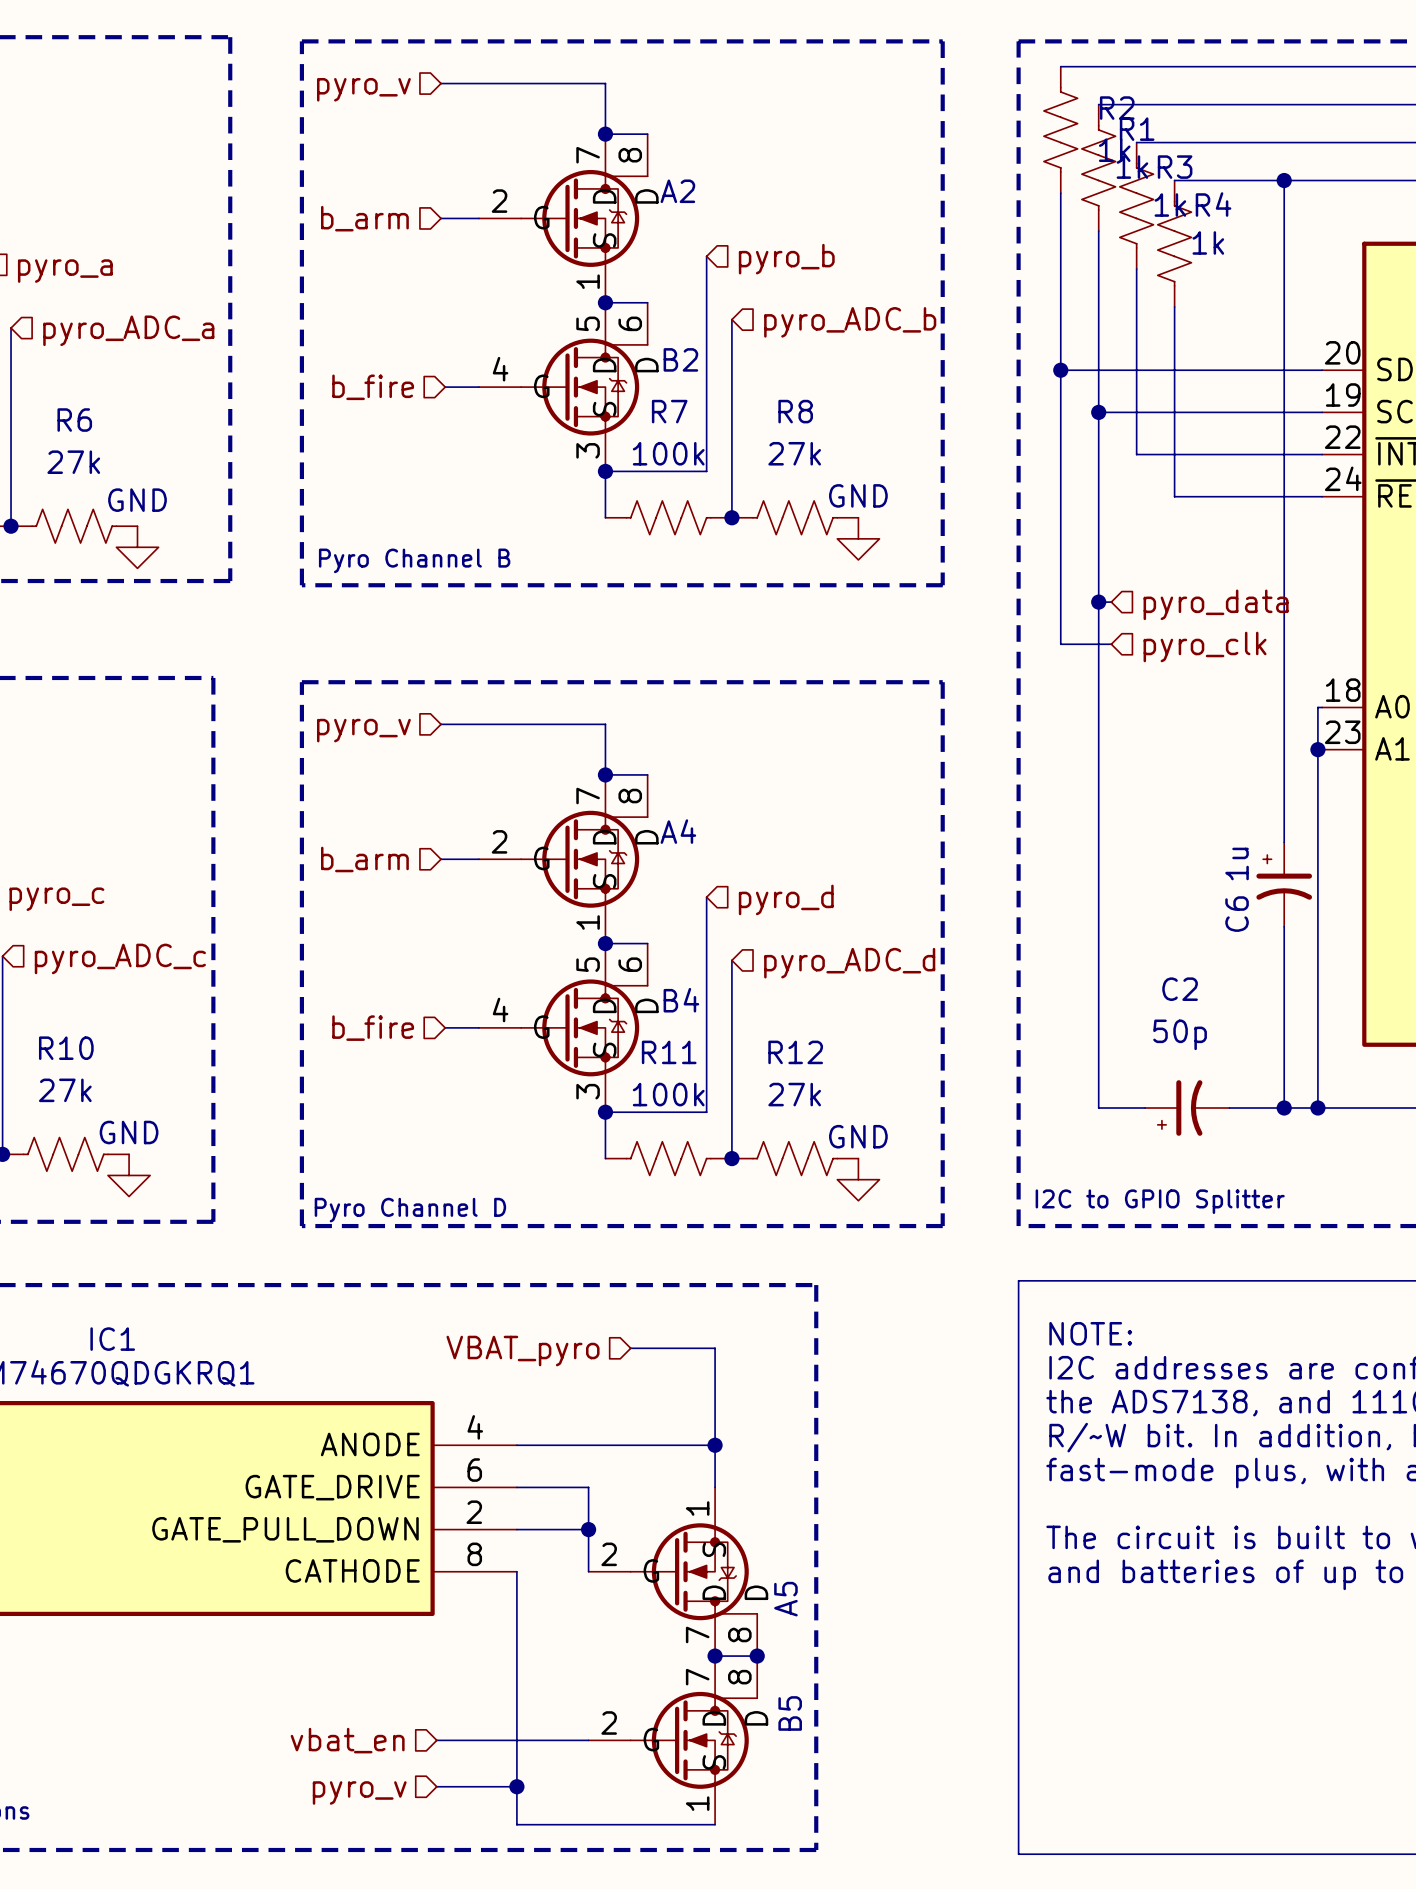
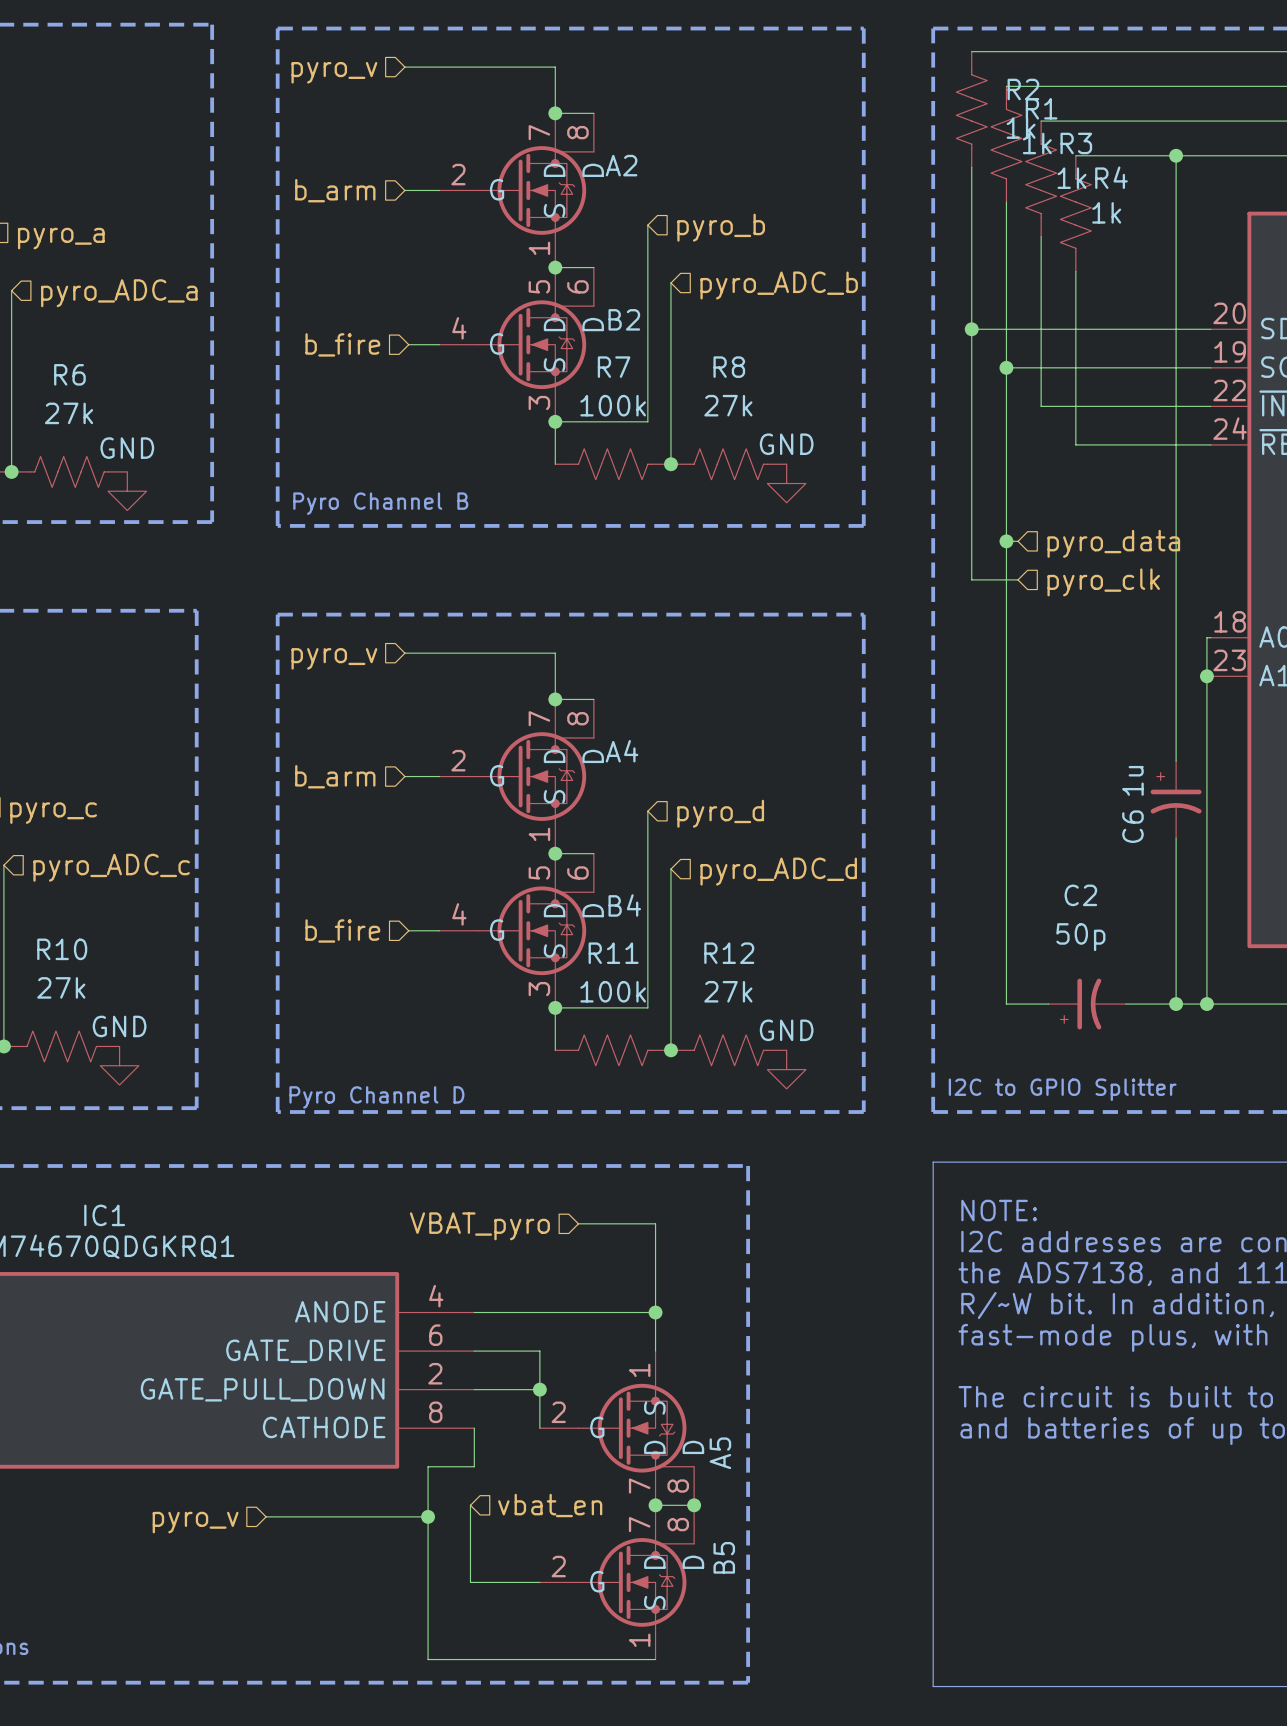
wire: (516, 1613) (516, 1824) -> (474, 1466) (428, 1466) (428, 1659) (474, 1659)
wire: none -> (266, 1516) (428, 1516)
junction: none -> (428, 1516)
hierarchical label rotation: 0° (347, 1740) -> 180° (550, 1505)
hierarchical label position: vbat_en (347, 1740) -> vbat_en (550, 1505)
wire: (436, 1740) (512, 1740) -> (470, 1505) (470, 1582)
wire: (436, 1786) (516, 1786) -> none
junction: (516, 1786) -> none
hierarchical label position: pyro_v (359, 1792) -> pyro_v (195, 1522)

